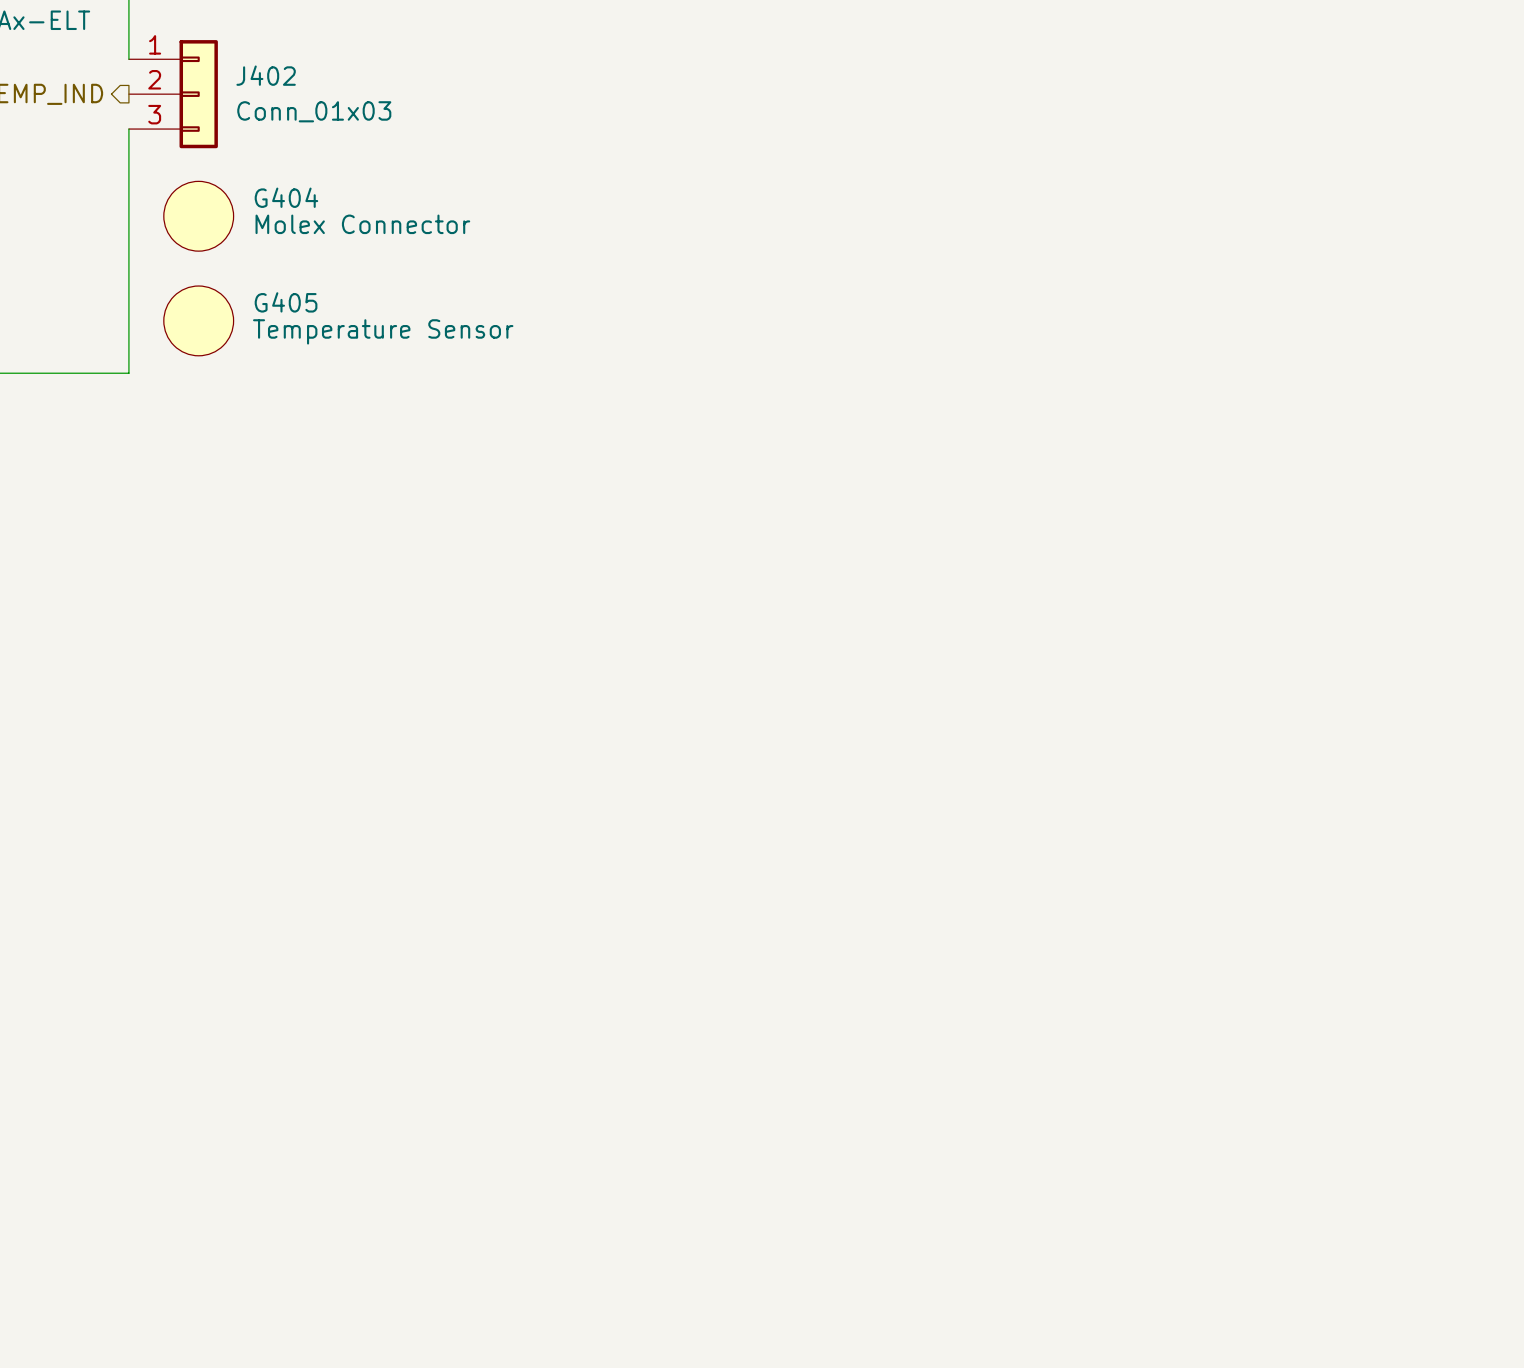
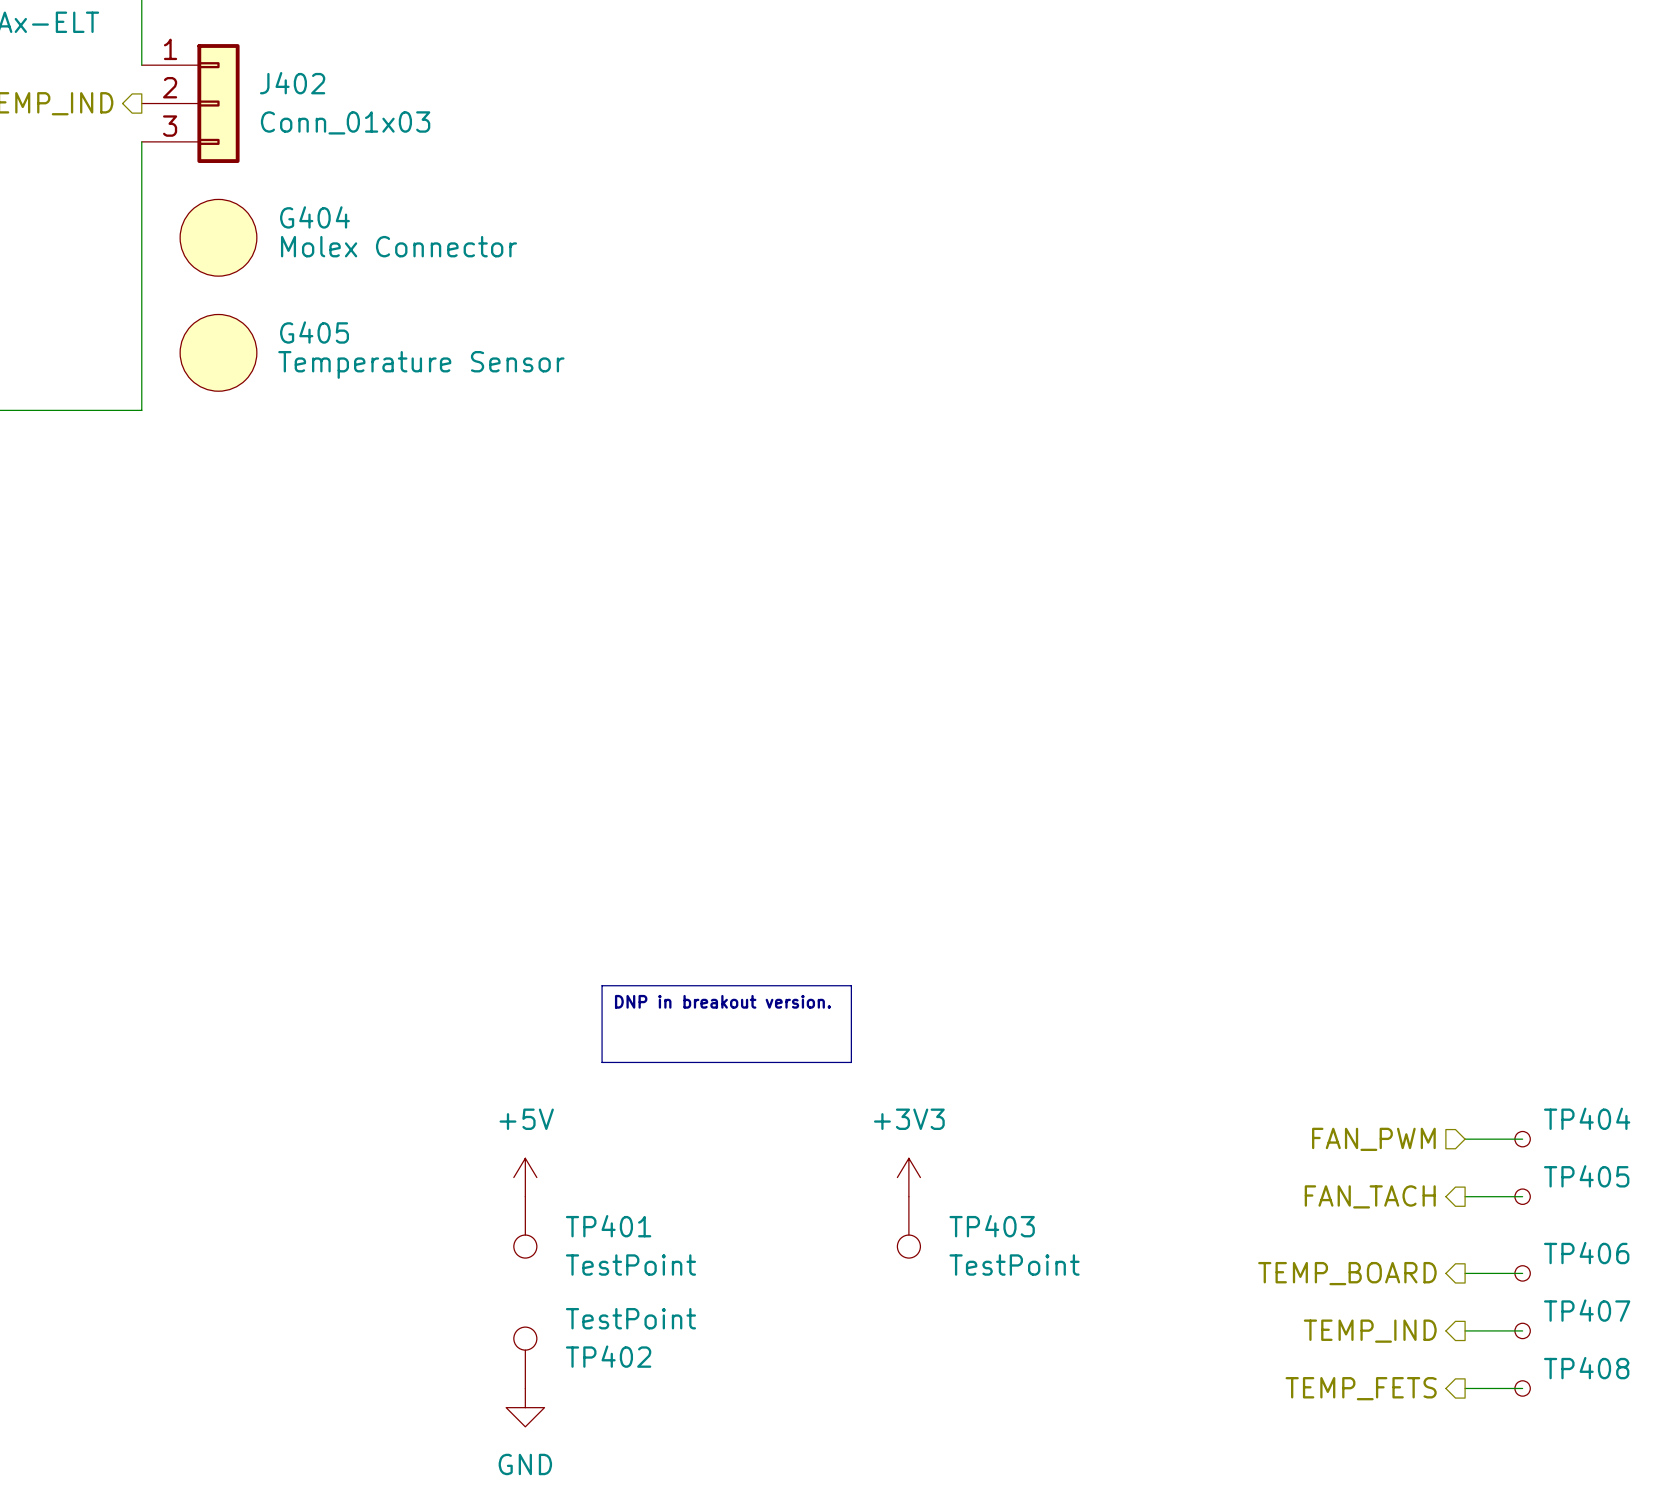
line: none -> (602, 985) (851, 985) (851, 1062) (602, 1062) (602, 985)
text: none -> DNP in breakout version. (722, 1001)
hierarchical label: none -> FAN_PWM (1373, 1139)
wire: none -> (1465, 1139) (1522, 1139)
TP404: none -> (1522, 1139)
power symbol: none -> +5V (525, 1177)
power symbol: none -> +3V3 (908, 1177)
hierarchical label: none -> FAN_TACH (1370, 1196)
wire: none -> (1465, 1196) (1522, 1196)
TP405: none -> (1522, 1196)
TP401: none -> TestPoint (525, 1227)
TP403: none -> TestPoint (908, 1227)
hierarchical label: none -> TEMP_BOARD (1347, 1273)
wire: none -> (1465, 1273) (1522, 1273)
TP406: none -> (1522, 1273)
hierarchical label: none -> TEMP_IND (1370, 1331)
wire: none -> (1465, 1330) (1522, 1330)
TP407: none -> (1522, 1330)
TP402: none -> TestPoint (525, 1357)
hierarchical label: none -> TEMP_FETS (1361, 1388)
wire: none -> (1465, 1388) (1522, 1388)
TP408: none -> (1522, 1388)
power symbol: none -> GND (525, 1407)

